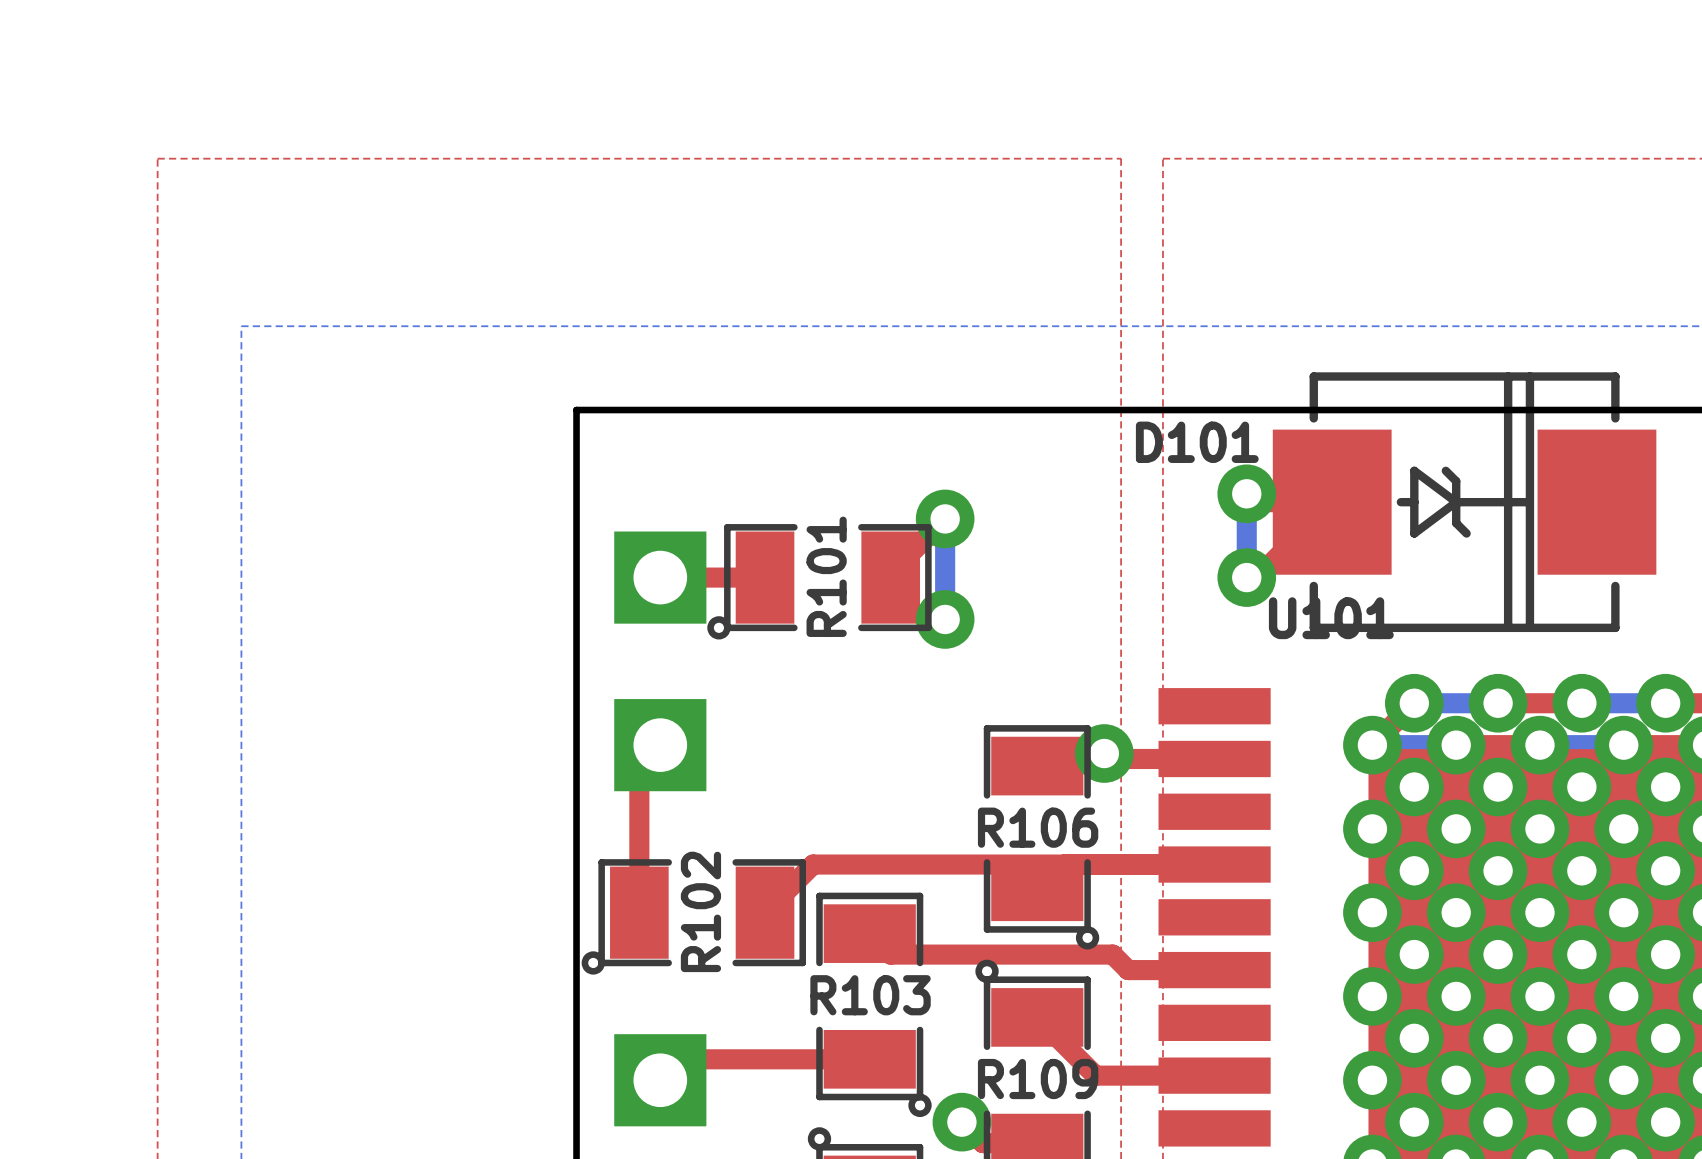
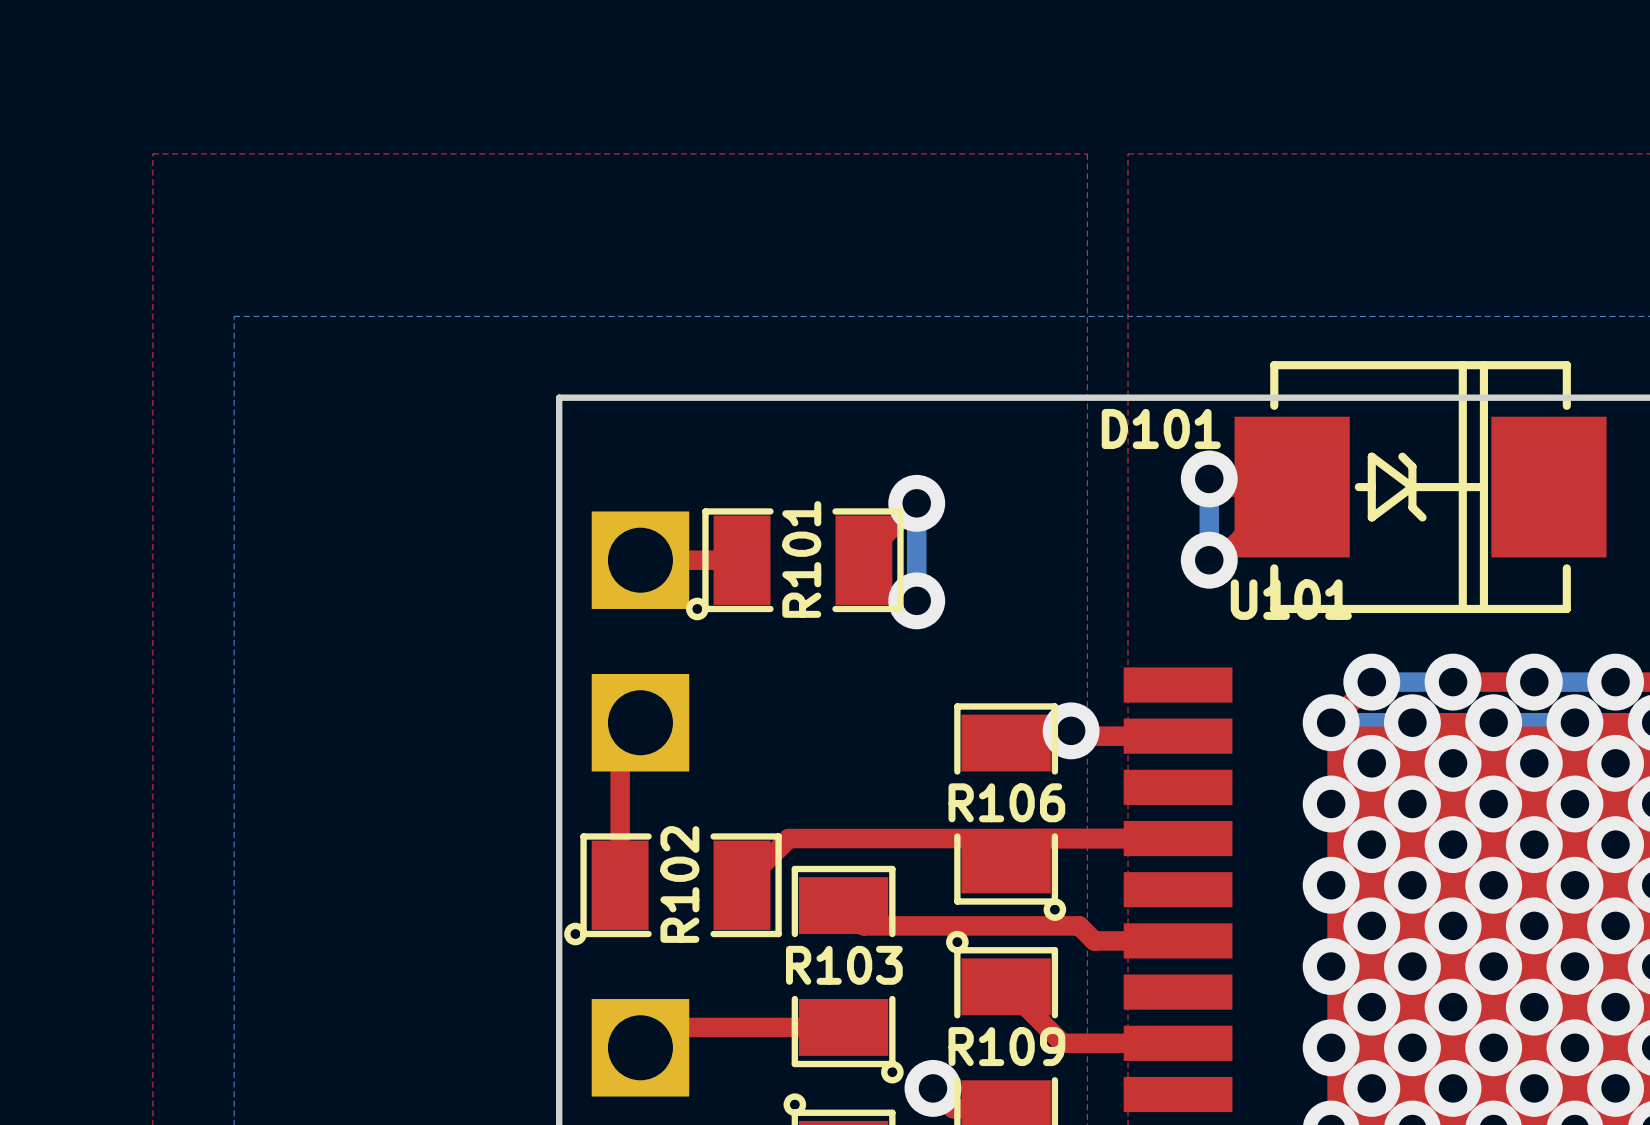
part footprint: [614, 531, 707, 624] -> [591, 511, 690, 609]
part footprint: [614, 699, 707, 792] -> [591, 673, 690, 772]
part footprint: [614, 1034, 707, 1127] -> [591, 999, 690, 1097]

